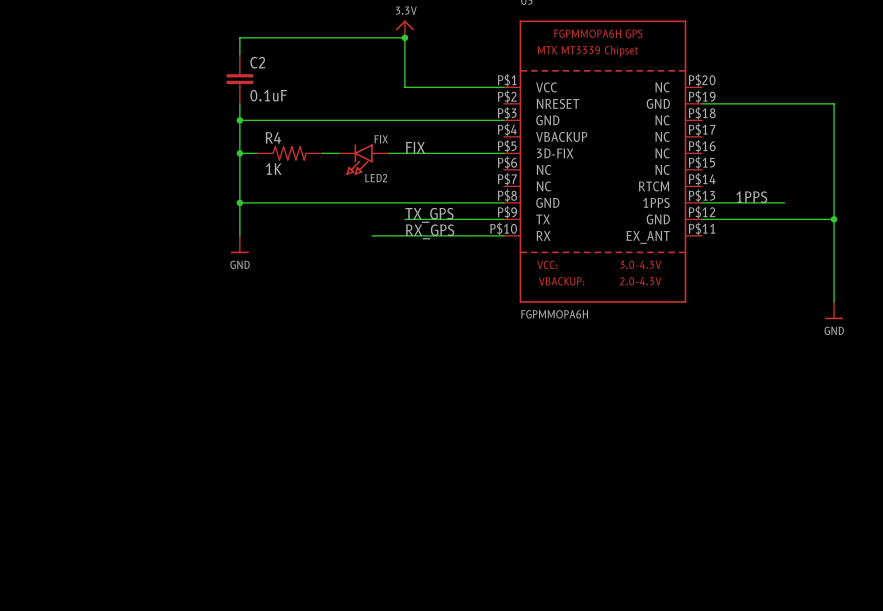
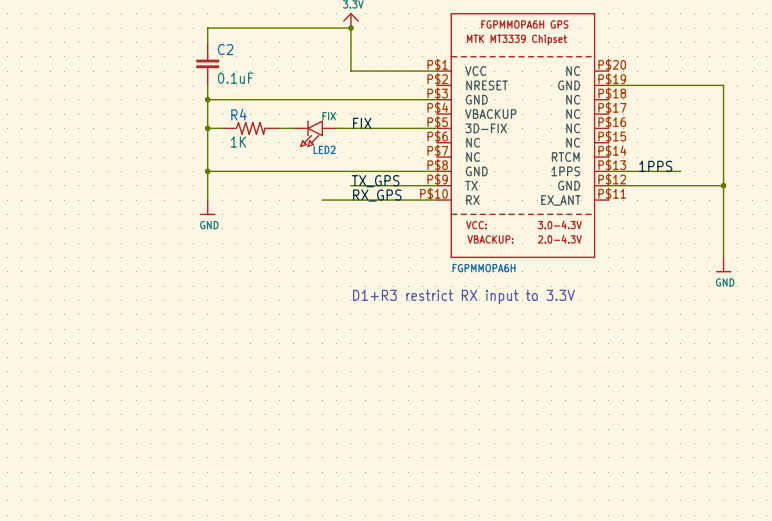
text: none -> D1+R3 restrict RX input to 3.3V (463, 297)

